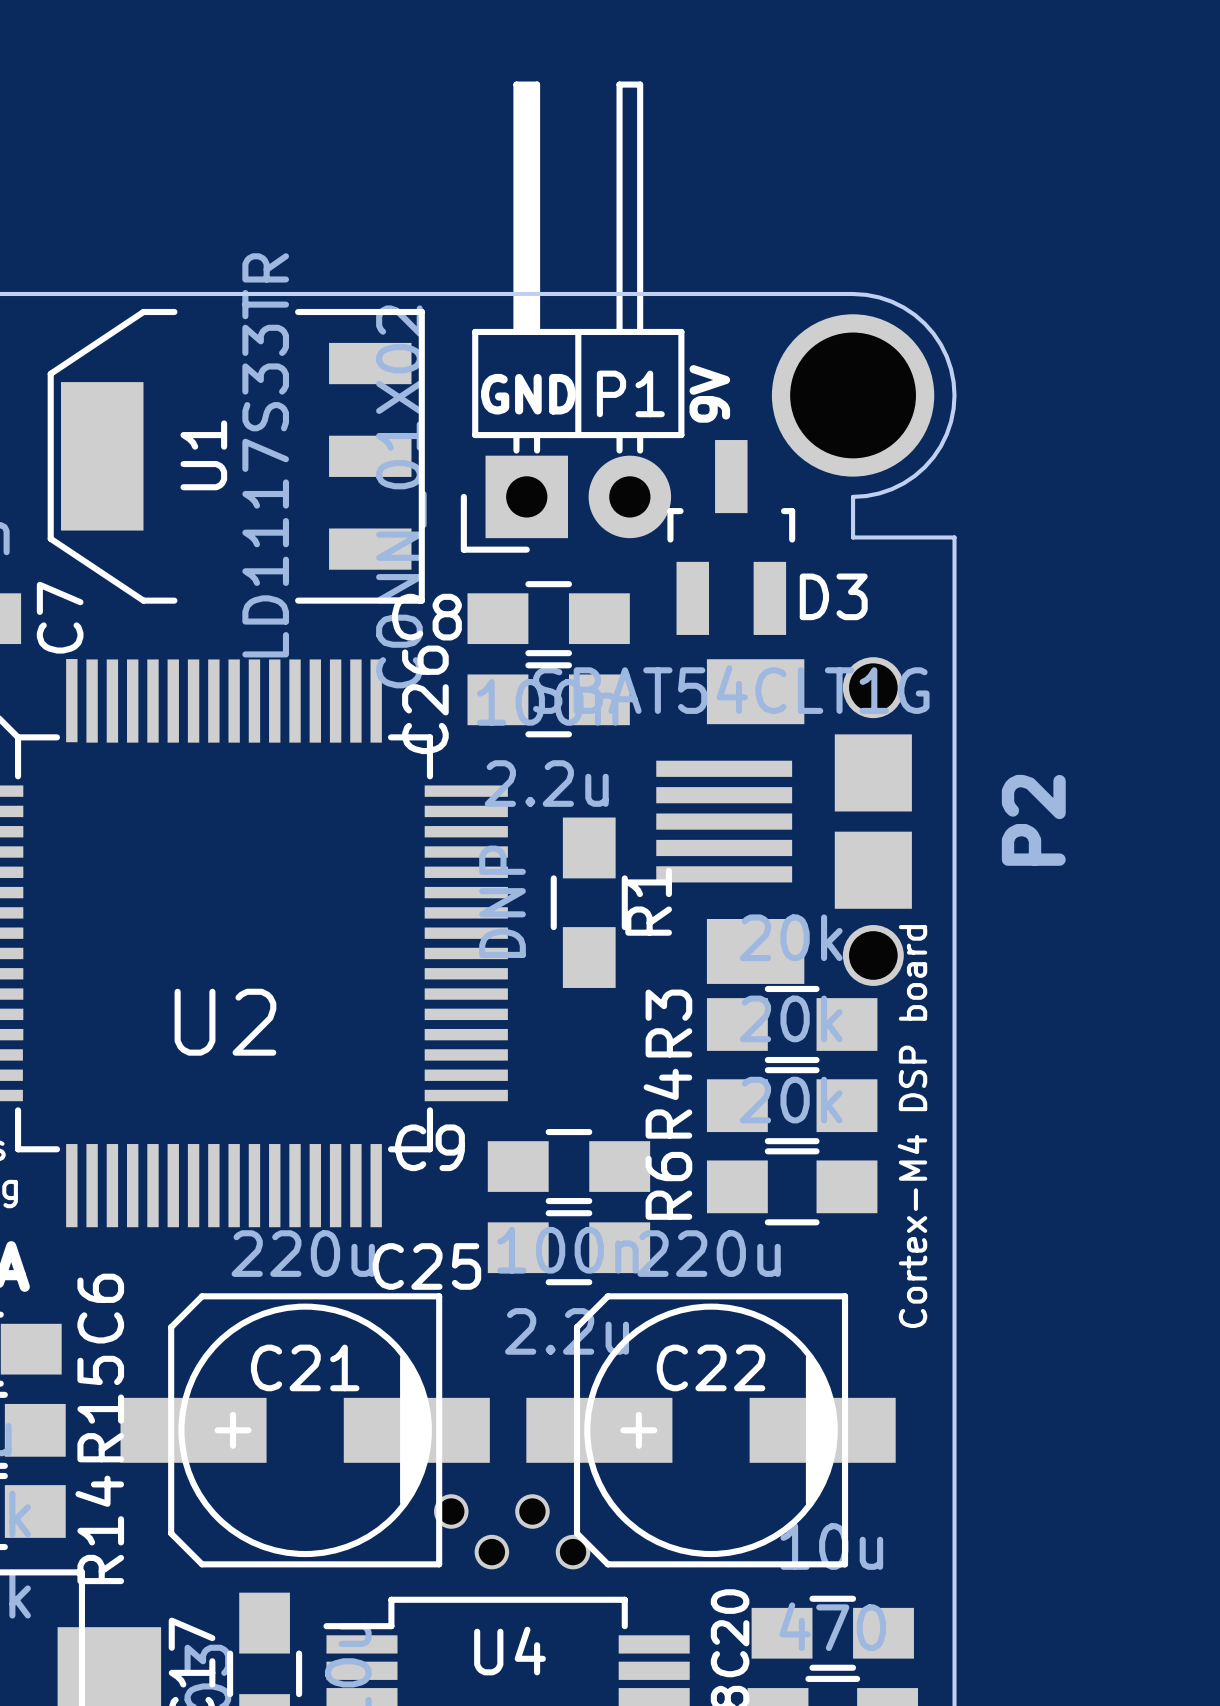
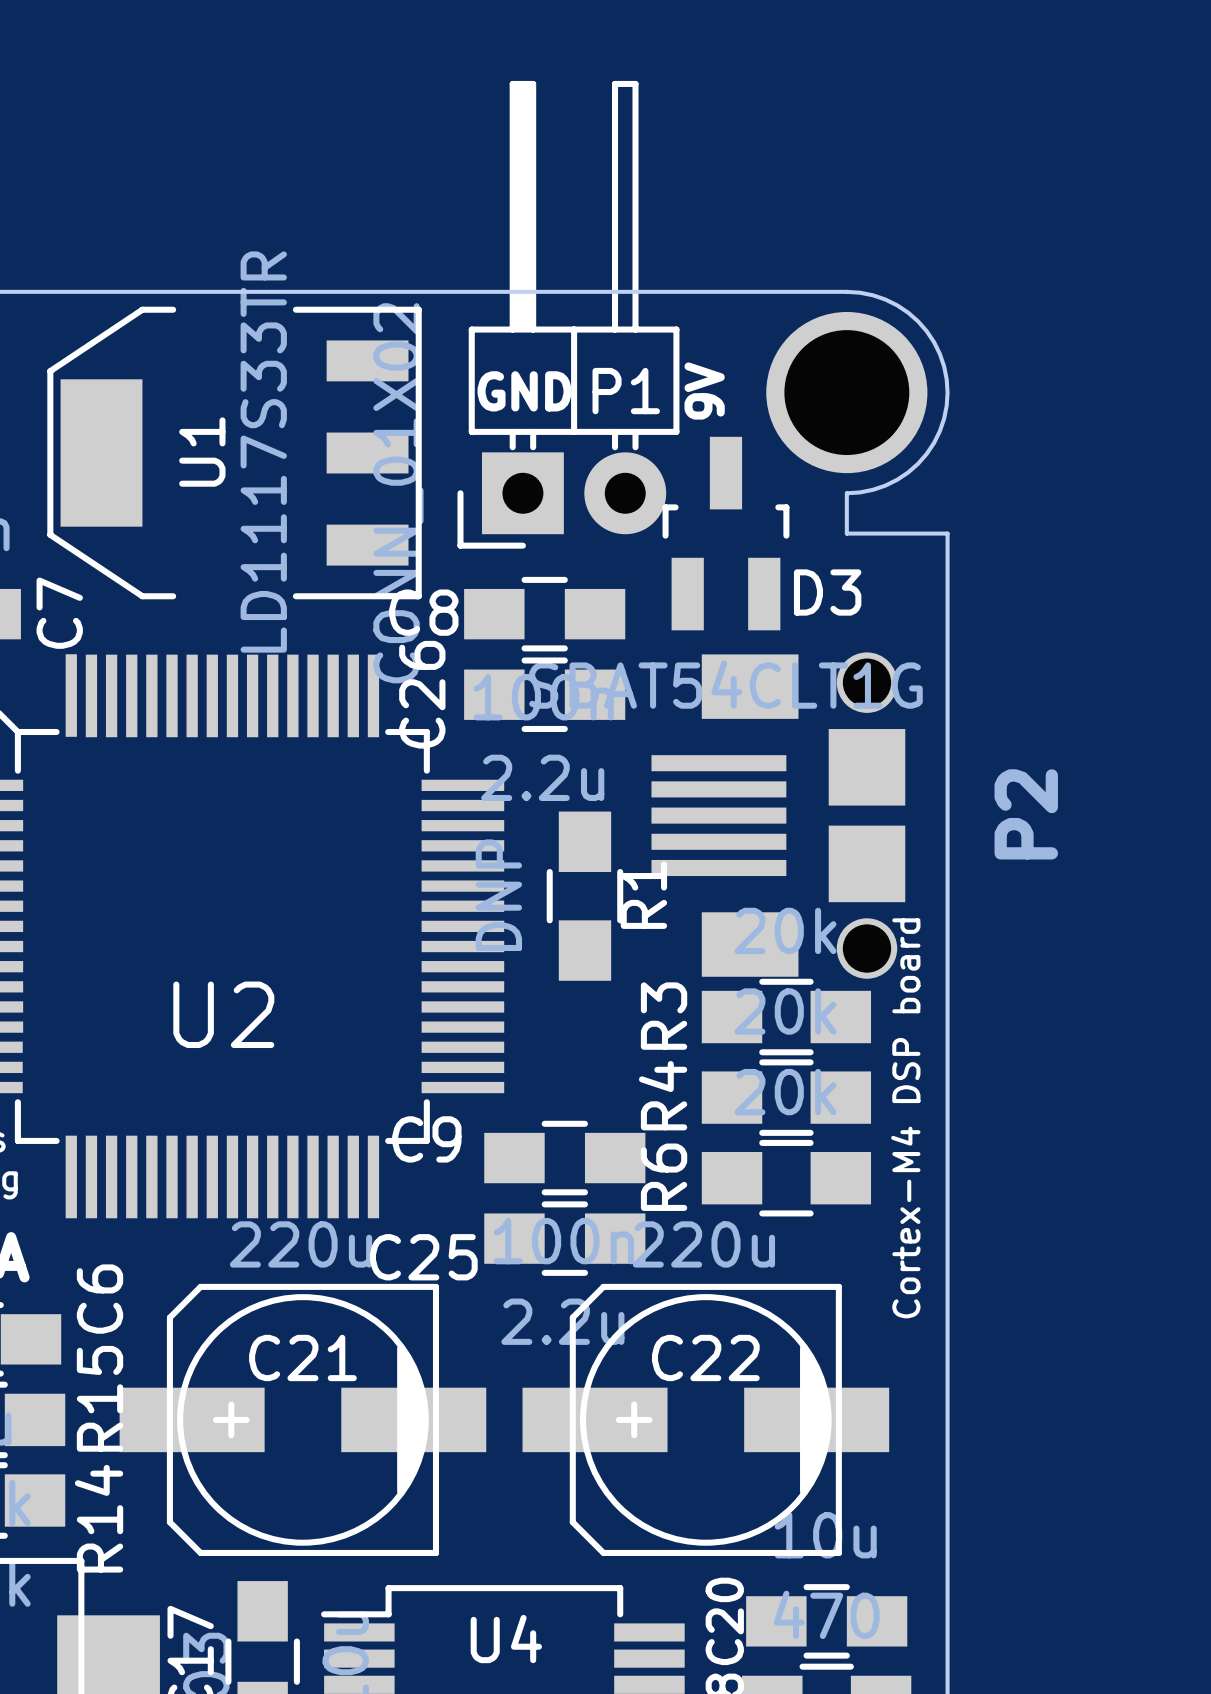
part: (451, 1511) -> none
part: (532, 1511) -> none
part: (491, 1552) -> none
part: (573, 1552) -> none

